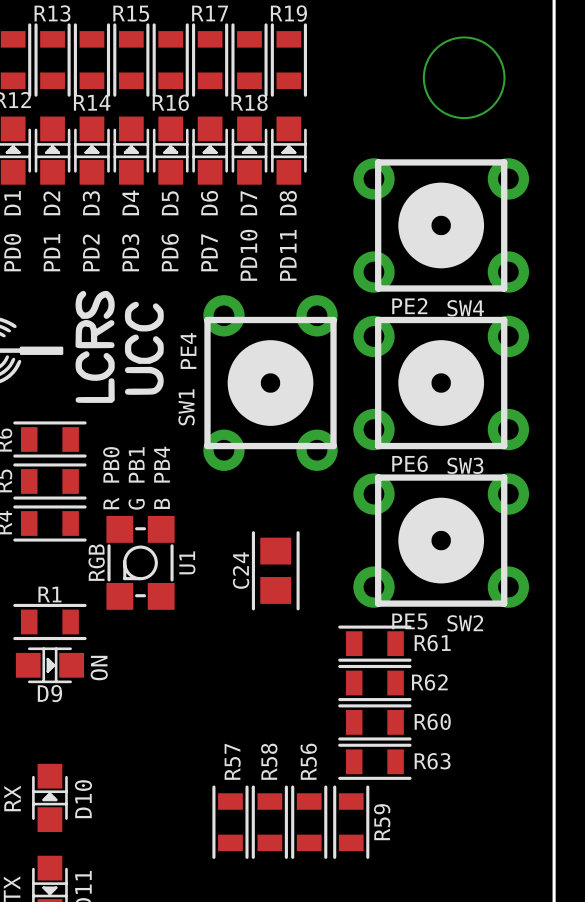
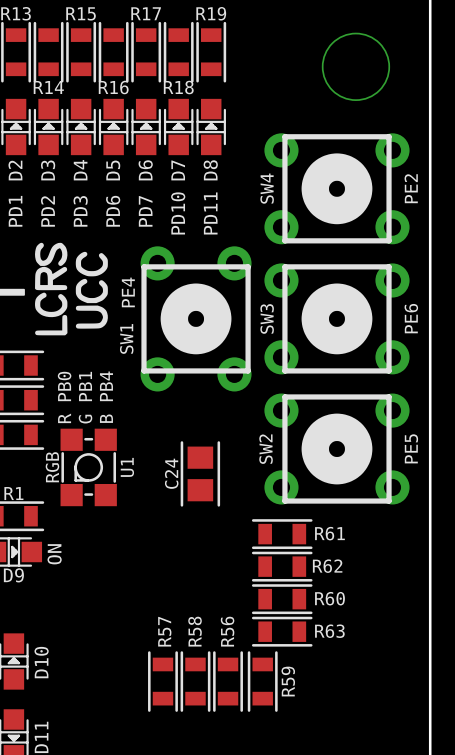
SW4 value rotation: 0° (409, 306) -> 90° counterclockwise (411, 188)
SW4 value position: PE2 (409, 306) -> PE2 (411, 188)
SW4 name rotation: 0° (465, 308) -> 90° counterclockwise (267, 188)
SW4 name position: SW4 (465, 308) -> SW4 (267, 188)
SW3 value rotation: 0° (410, 463) -> 90° counterclockwise (411, 318)
SW3 value position: PE6 (410, 463) -> PE6 (411, 318)
SW3 name rotation: 0° (465, 465) -> 90° counterclockwise (267, 318)
SW3 name position: SW3 (465, 465) -> SW3 (267, 318)
SW2 value rotation: 0° (409, 621) -> 90° counterclockwise (411, 448)
SW2 value position: PE5 (409, 621) -> PE5 (411, 448)
SW2 name rotation: 0° (465, 623) -> 90° counterclockwise (266, 449)
SW2 name position: SW2 (465, 623) -> SW2 (266, 449)

